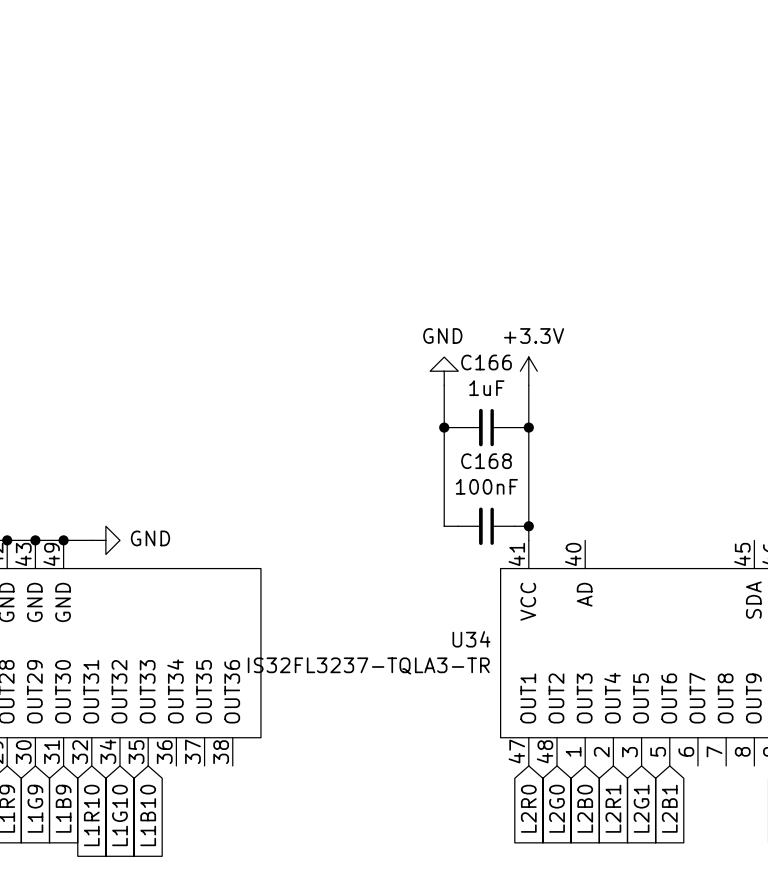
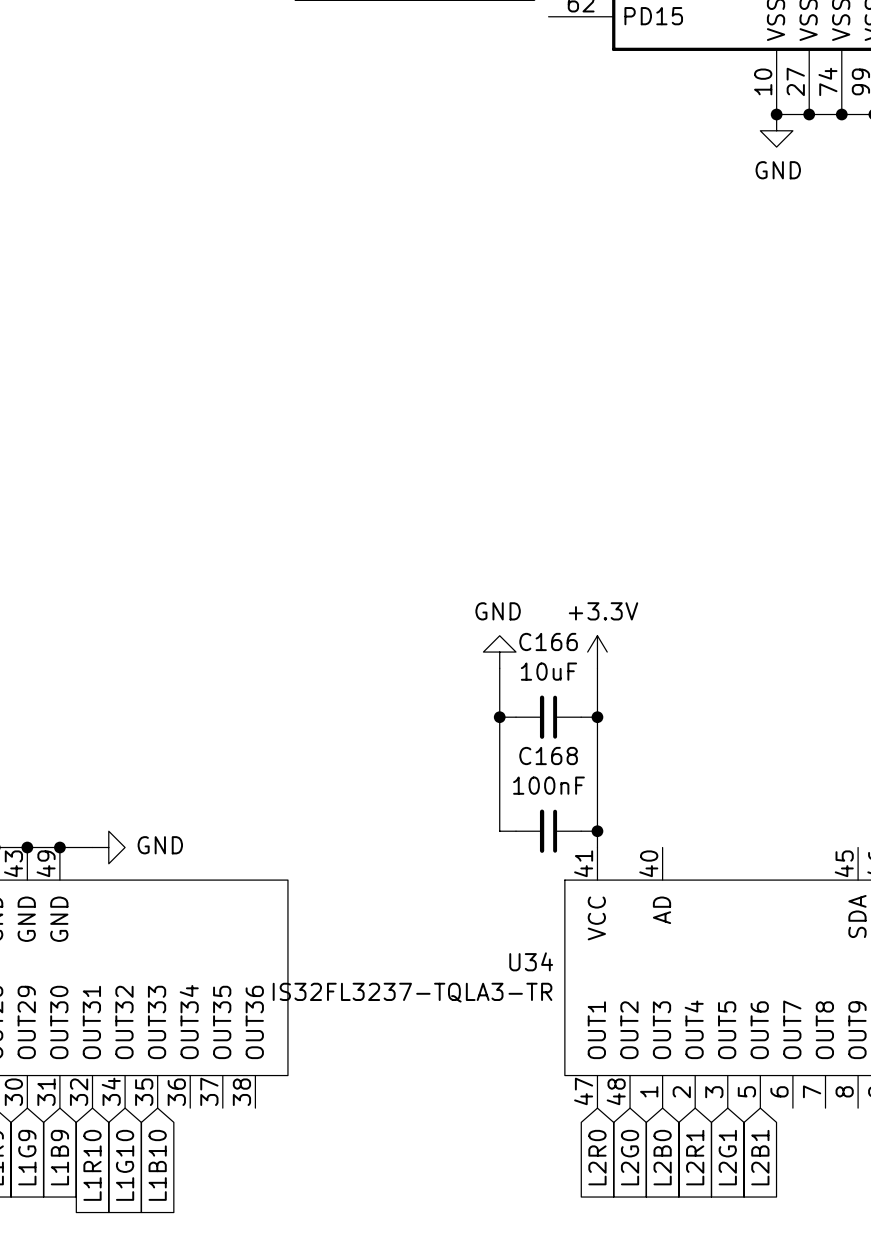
C166 value: 1uF (486, 388) -> 10uF (548, 671)

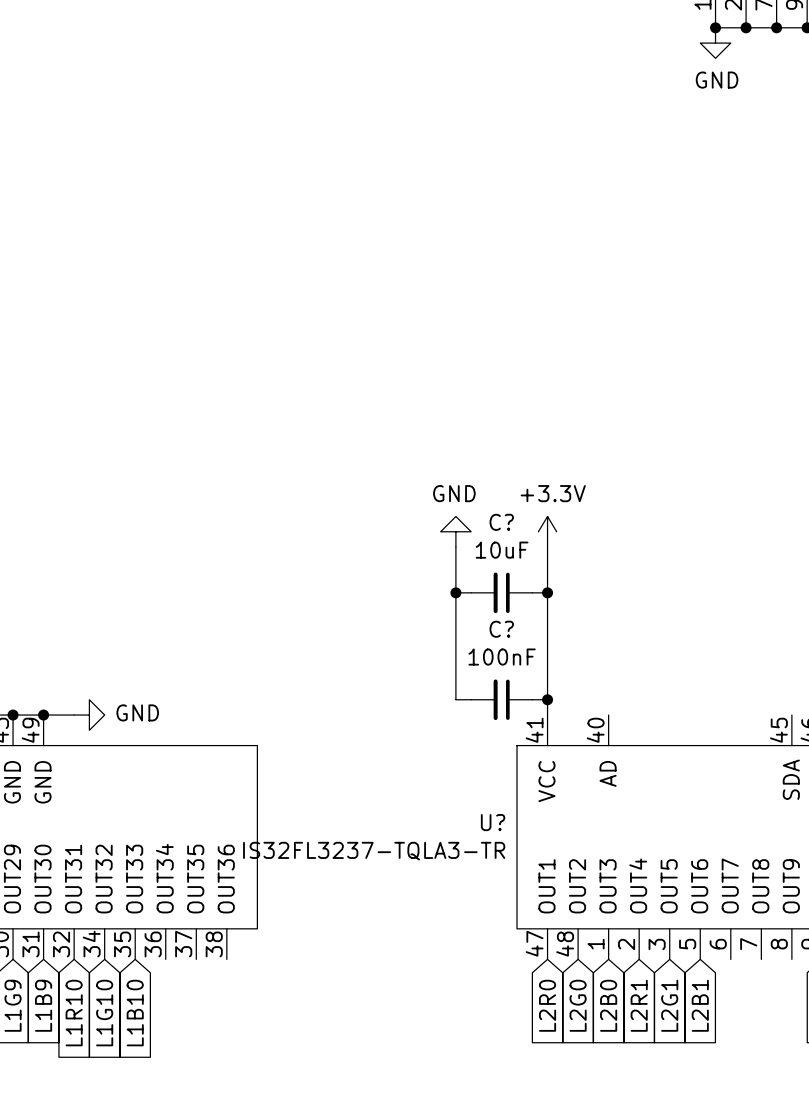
C166 name: C166 (548, 641) -> C? (501, 522)
C168 name: C168 (548, 756) -> C? (501, 629)
U34 name: U34 (531, 961) -> U? (493, 822)

